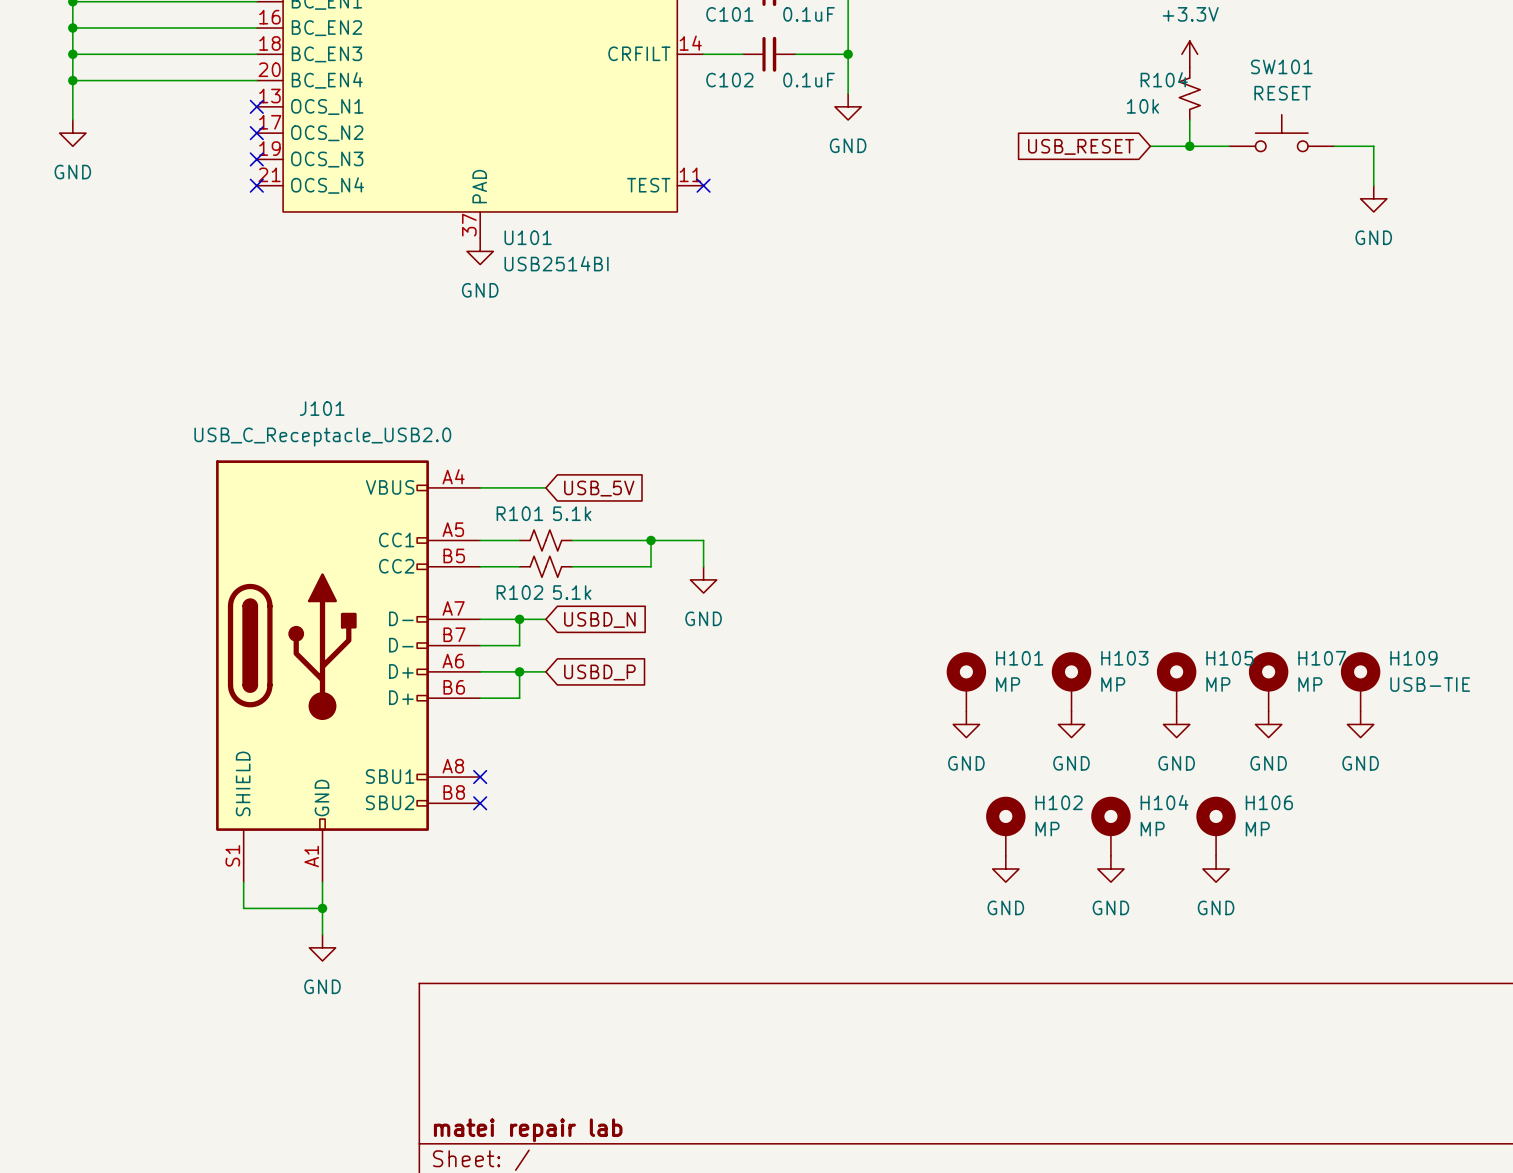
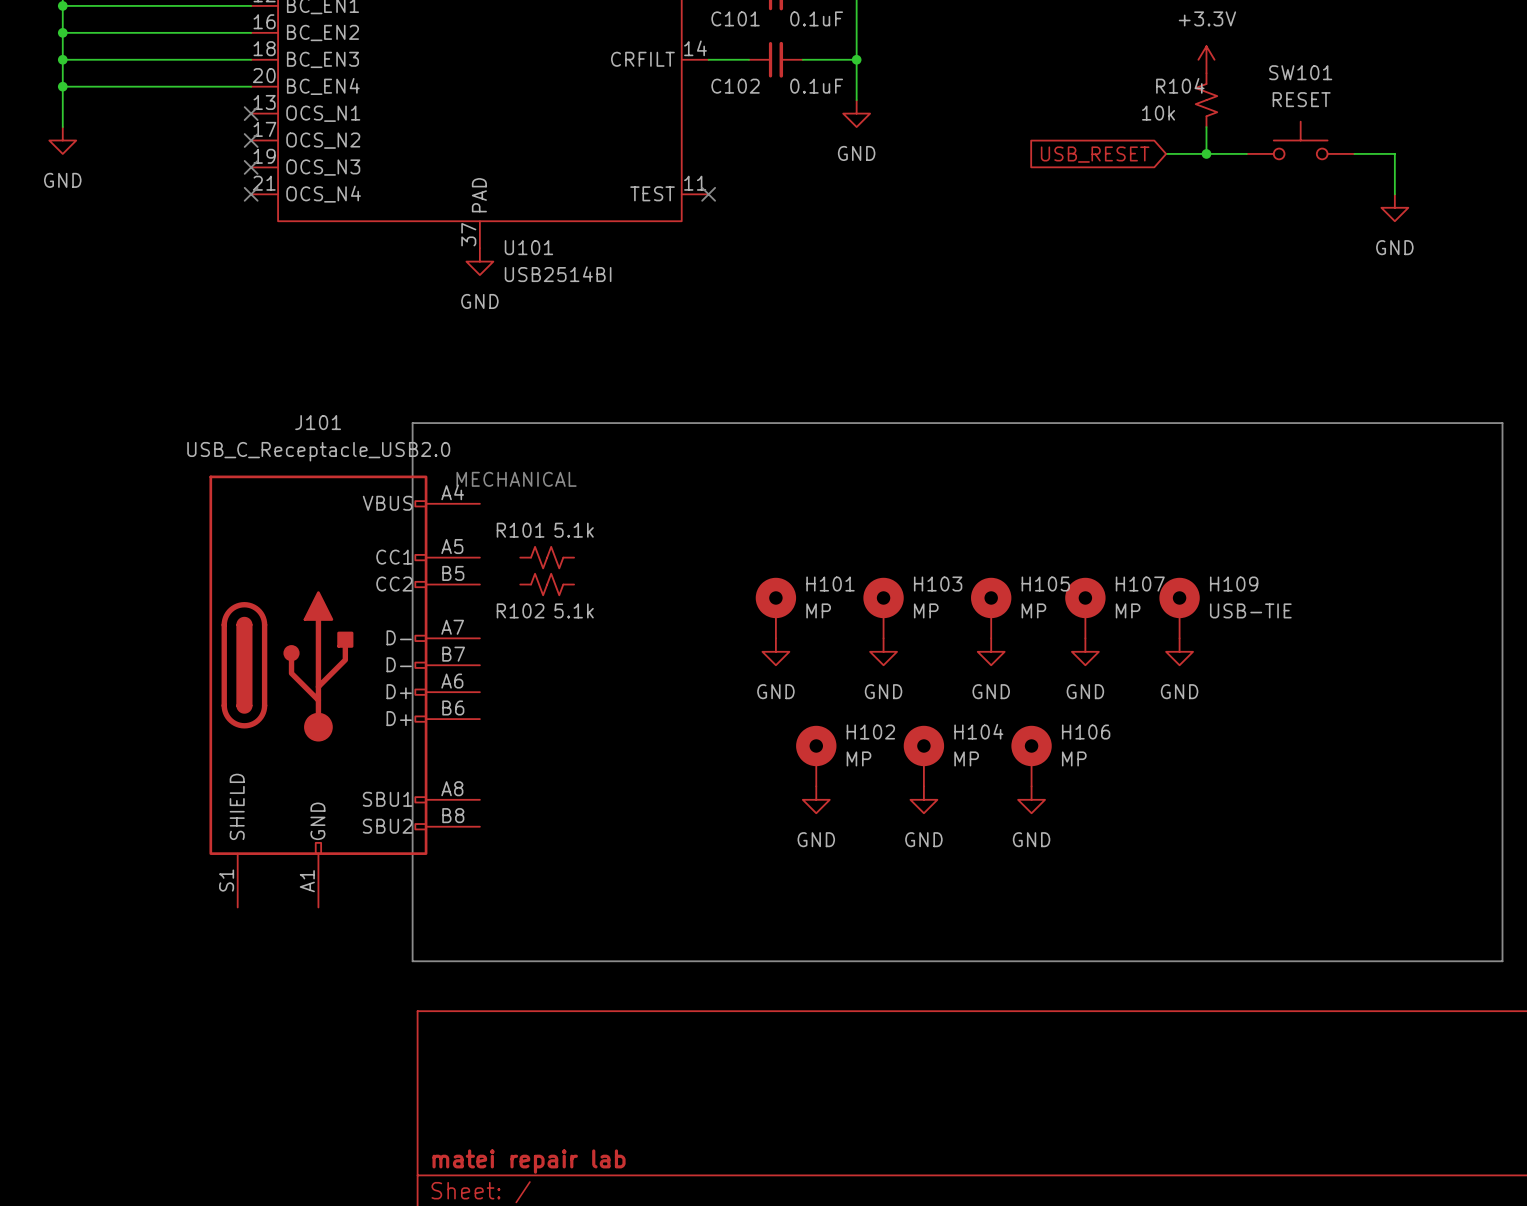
line: none -> (412, 423) (412, 961) (1502, 961) (1502, 423) (412, 423)
text: none -> MECHANICAL (516, 479)
wire: (480, 487) (545, 487) -> none
global label: USB_5V (599, 488) -> none
wire: (480, 540) (519, 540) -> none
wire: (572, 540) (703, 540) (703, 566) -> none
wire: (651, 540) (651, 566) (572, 566) -> none
junction: (651, 540) -> none
wire: (480, 566) (519, 566) -> none
power symbol position: GND (703, 579) -> GND (775, 651)
wire: (480, 619) (545, 619) -> none
wire: (519, 619) (519, 645) (480, 645) -> none
junction: (519, 619) -> none
global label: USBD_N (599, 619) -> none
power symbol: none -> GND (883, 651)
power symbol: none -> GND (991, 651)
power symbol: none -> GND (1085, 651)
power symbol: none -> GND (1179, 651)
wire: (480, 671) (545, 671) -> none
wire: (519, 671) (519, 698) (480, 698) -> none
junction: (519, 671) -> none
global label: USBD_P (599, 672) -> none
H101 position: (966, 681) -> (775, 608)
H103 position: (1071, 681) -> (883, 608)
H105 position: (1176, 681) -> (991, 608)
H107 position: (1268, 681) -> (1085, 608)
H109 position: (1360, 681) -> (1179, 608)
power symbol: GND (966, 724) -> none
power symbol: GND (1071, 724) -> none
power symbol: GND (1176, 724) -> none
power symbol: GND (1268, 724) -> none
power symbol: GND (1360, 724) -> none
no-connect mark: (480, 777) -> none
power symbol: none -> GND (816, 799)
power symbol: none -> GND (923, 799)
power symbol: none -> GND (1031, 799)
no-connect mark: (480, 803) -> none
H102 position: (1005, 826) -> (816, 756)
H104 position: (1110, 826) -> (923, 756)
H106 position: (1216, 826) -> (1031, 756)
power symbol: GND (1005, 869) -> none
power symbol: GND (1110, 869) -> none
power symbol: GND (1216, 869) -> none
wire: (243, 882) (243, 908) (322, 908) -> none
wire: (322, 882) (322, 934) -> none
junction: (322, 908) -> none
power symbol: GND (322, 947) -> none

